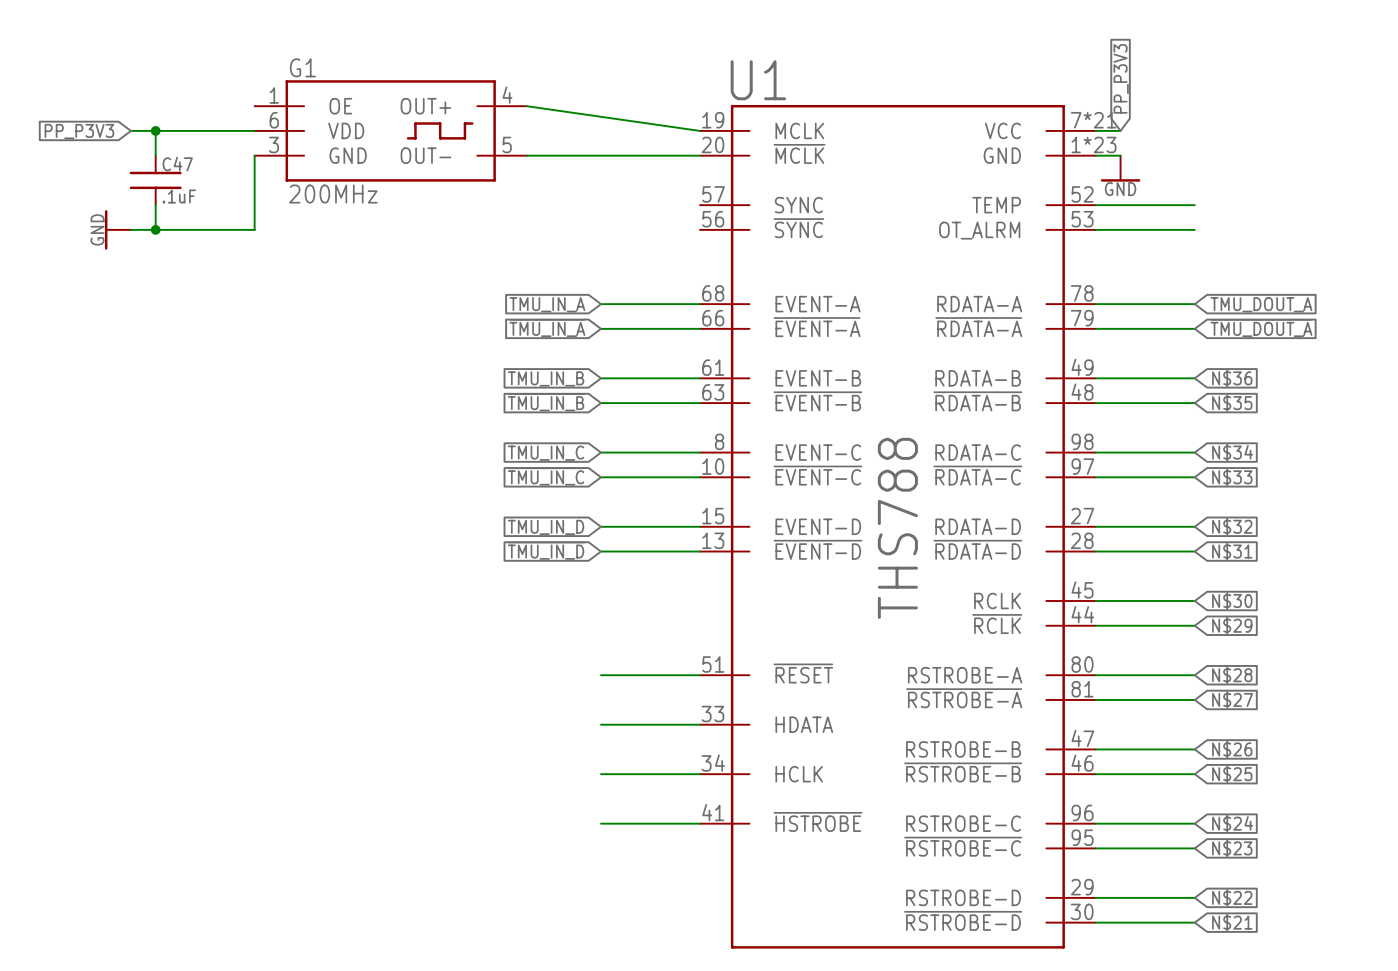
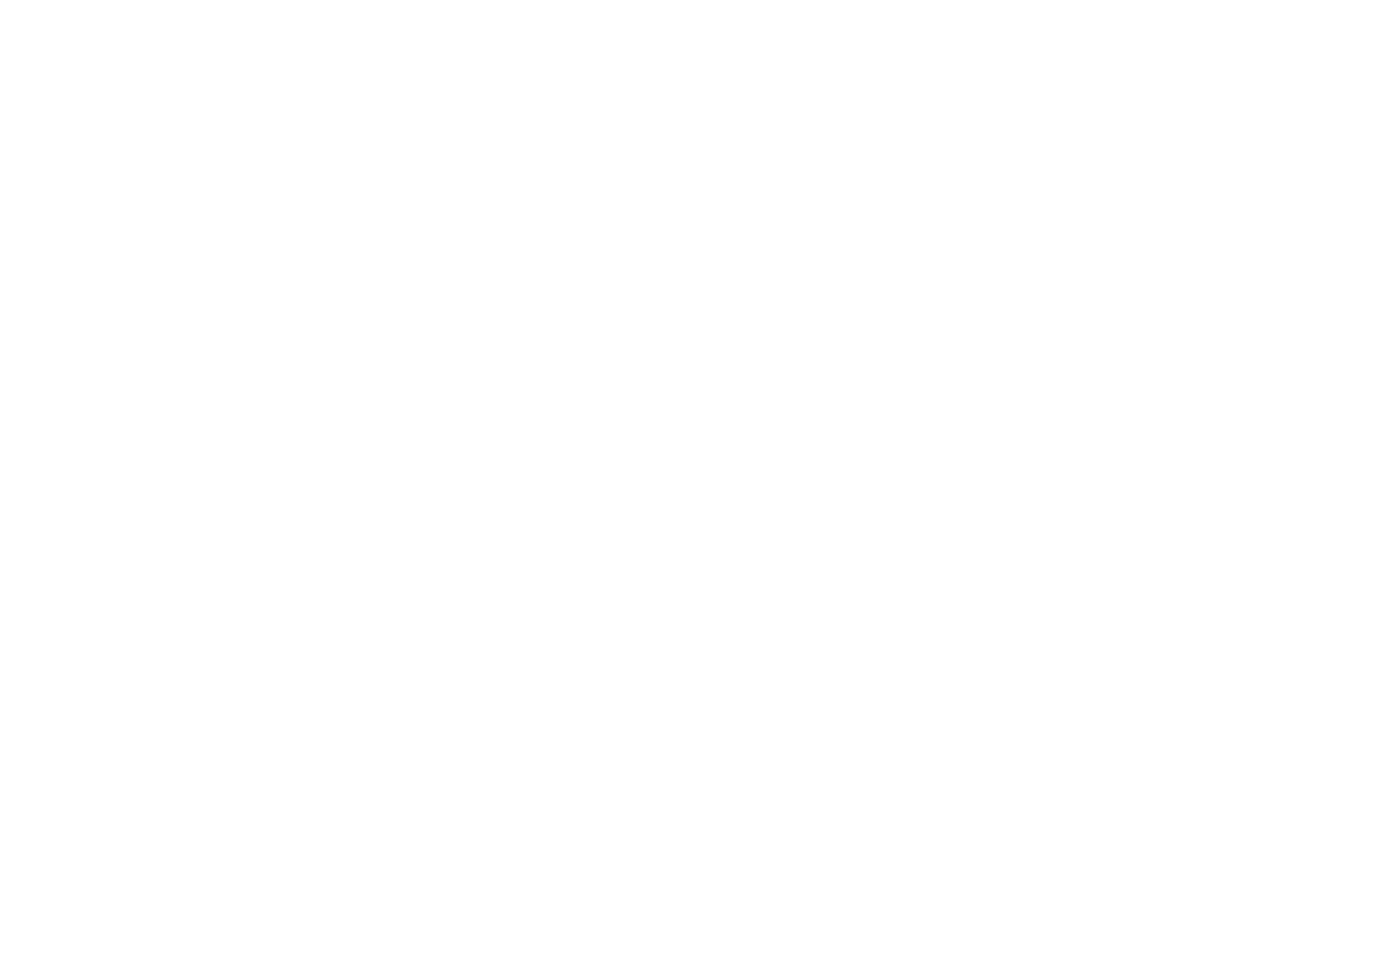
global label: PP_P3V3 (1121, 78) -> none
wire: (526, 106) (699, 130) -> none
wire: (130, 130) (254, 130) -> none
wire: (155, 130) (155, 155) -> none
junction: (155, 130) -> none
G1: 200MHz (390, 130) -> none
wire: (1095, 130) (1120, 130) -> none
global label: PP_P3V3 (79, 131) -> none
wire: (254, 155) (254, 229) (130, 229) -> none
wire: (526, 155) (699, 155) -> none
wire: (1095, 155) (1120, 155) -> none
power symbol: GND (1120, 168) -> none
C47: .1uF (155, 180) -> none
wire: (155, 205) (155, 229) -> none
wire: (1095, 205) (1194, 205) -> none
power symbol: GND (117, 229) -> none
junction: (155, 229) -> none
wire: (1095, 229) (1194, 229) -> none
global label: TMU_IN_A (547, 304) -> none
wire: (601, 304) (699, 304) -> none
wire: (1095, 304) (1194, 304) -> none
global label: TMU_DOUT_A (1261, 304) -> none
global label: ~{TMU_IN_A} (547, 328) -> none
wire: (601, 328) (699, 328) -> none
wire: (1095, 328) (1194, 328) -> none
global label: ~{TMU_DOUT_A} (1261, 328) -> none
global label: TMU_IN_B (546, 378) -> none
wire: (601, 378) (699, 378) -> none
wire: (1095, 378) (1194, 378) -> none
global label: N$36 (1232, 378) -> none
global label: ~{TMU_IN_B} (546, 402) -> none
wire: (601, 403) (699, 403) -> none
wire: (1095, 403) (1194, 403) -> none
global label: N$35 (1232, 403) -> none
wire: (601, 452) (699, 452) -> none
wire: (1095, 452) (1194, 452) -> none
global label: N$34 (1232, 452) -> none
global label: TMU_IN_C (546, 453) -> none
global label: ~{TMU_IN_C} (546, 476) -> none
wire: (601, 477) (699, 477) -> none
wire: (1095, 477) (1194, 477) -> none
global label: N$33 (1232, 477) -> none
wire: (601, 526) (699, 526) -> none
U1: (897, 526) -> none
wire: (1095, 526) (1194, 526) -> none
global label: N$32 (1232, 526) -> none
global label: TMU_IN_D (546, 527) -> none
global label: ~{TMU_IN_D} (546, 550) -> none
wire: (601, 551) (699, 551) -> none
wire: (1095, 551) (1194, 551) -> none
global label: N$31 (1232, 551) -> none
wire: (1095, 601) (1194, 601) -> none
global label: N$30 (1232, 601) -> none
wire: (1095, 625) (1194, 625) -> none
global label: N$29 (1232, 625) -> none
wire: (601, 675) (699, 675) -> none
wire: (1095, 675) (1194, 675) -> none
global label: N$28 (1232, 675) -> none
wire: (1095, 699) (1194, 699) -> none
global label: N$27 (1232, 699) -> none
wire: (601, 724) (699, 724) -> none
wire: (1095, 749) (1194, 749) -> none
global label: N$26 (1232, 749) -> none
wire: (601, 774) (699, 774) -> none
wire: (1095, 774) (1194, 774) -> none
global label: N$25 (1232, 774) -> none
wire: (601, 823) (699, 823) -> none
wire: (1095, 823) (1194, 823) -> none
global label: N$24 (1232, 823) -> none
wire: (1095, 848) (1194, 848) -> none
global label: N$23 (1232, 848) -> none
wire: (1095, 897) (1194, 897) -> none
global label: N$22 (1232, 897) -> none
wire: (1095, 922) (1194, 922) -> none
global label: N$21 (1232, 922) -> none

